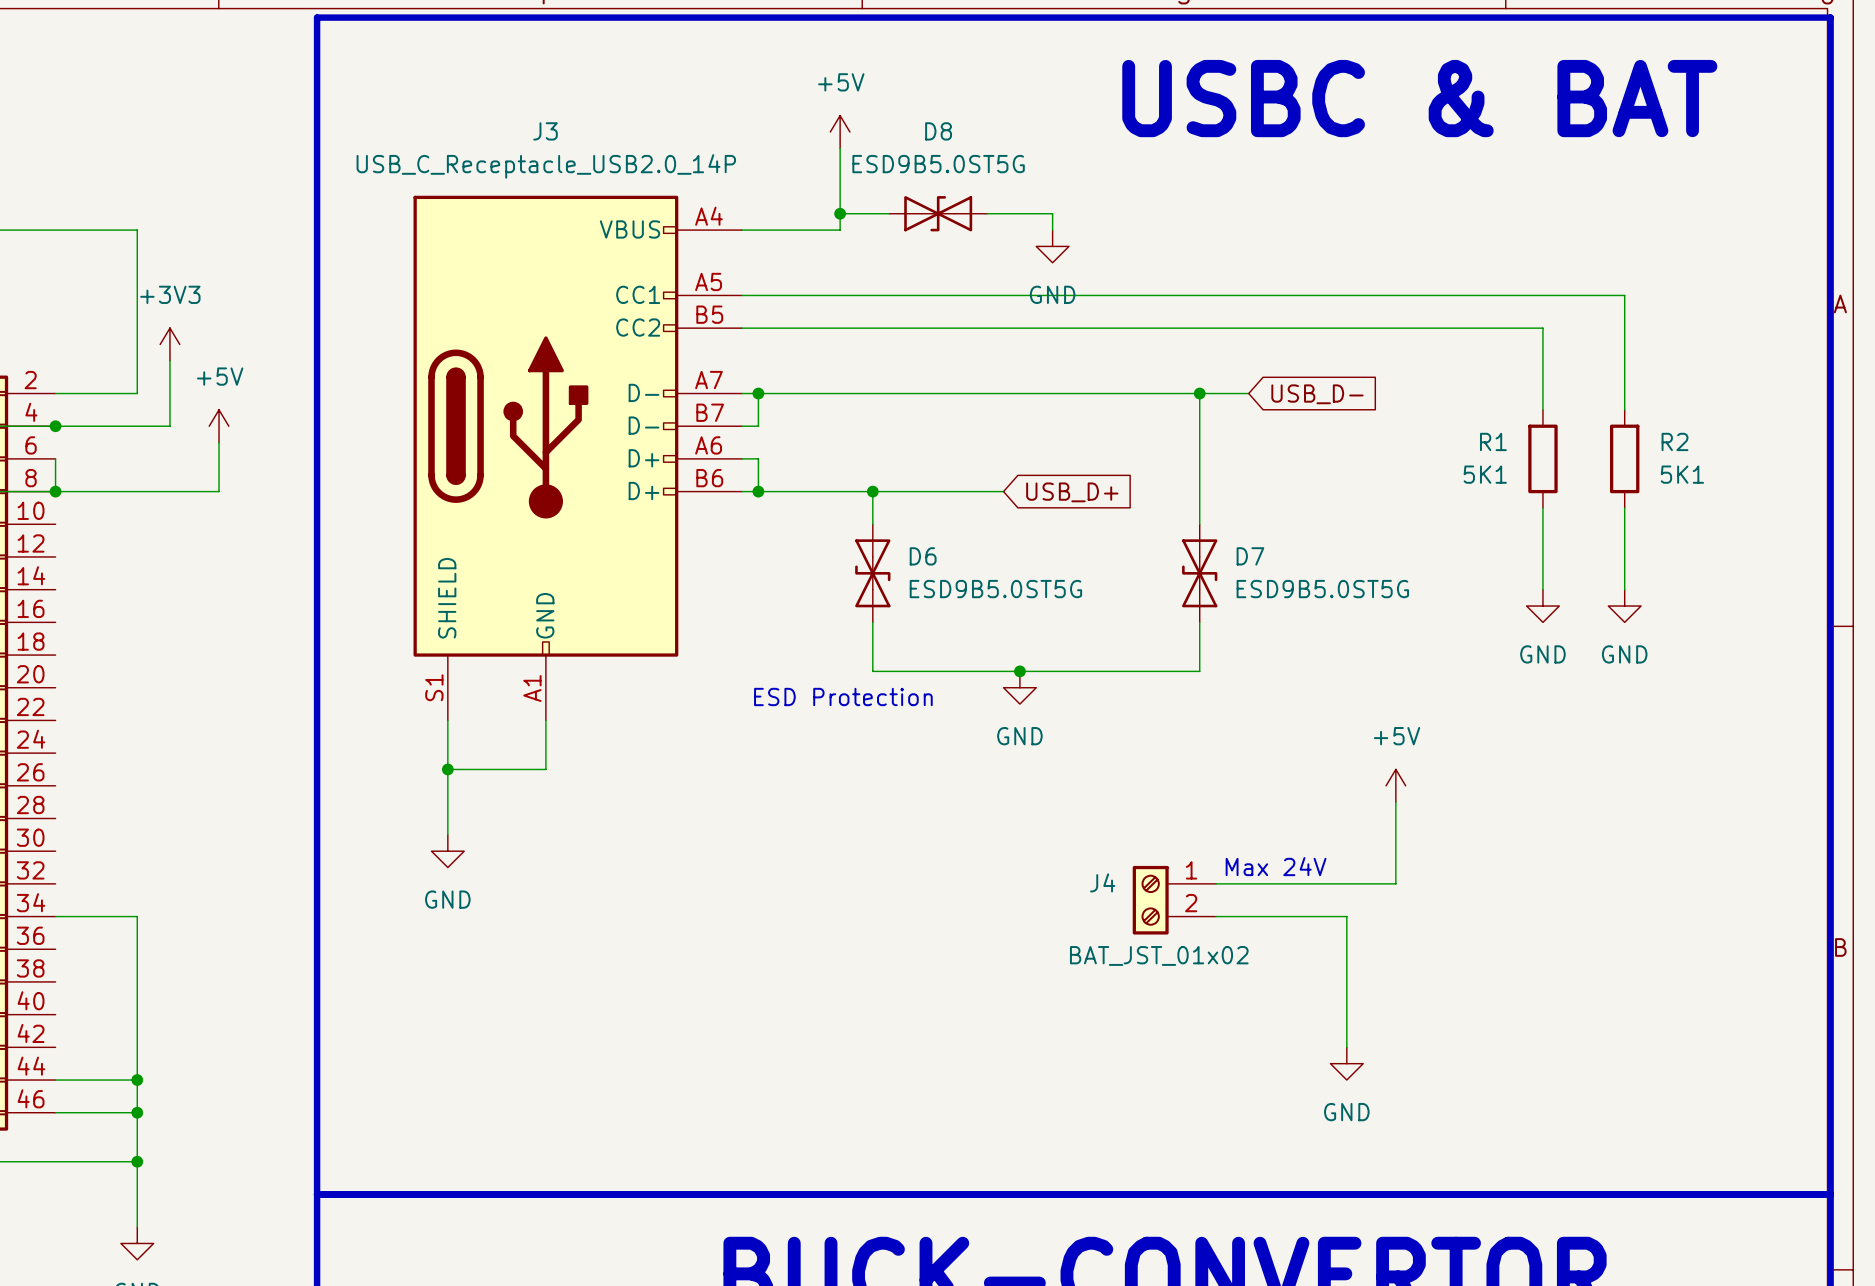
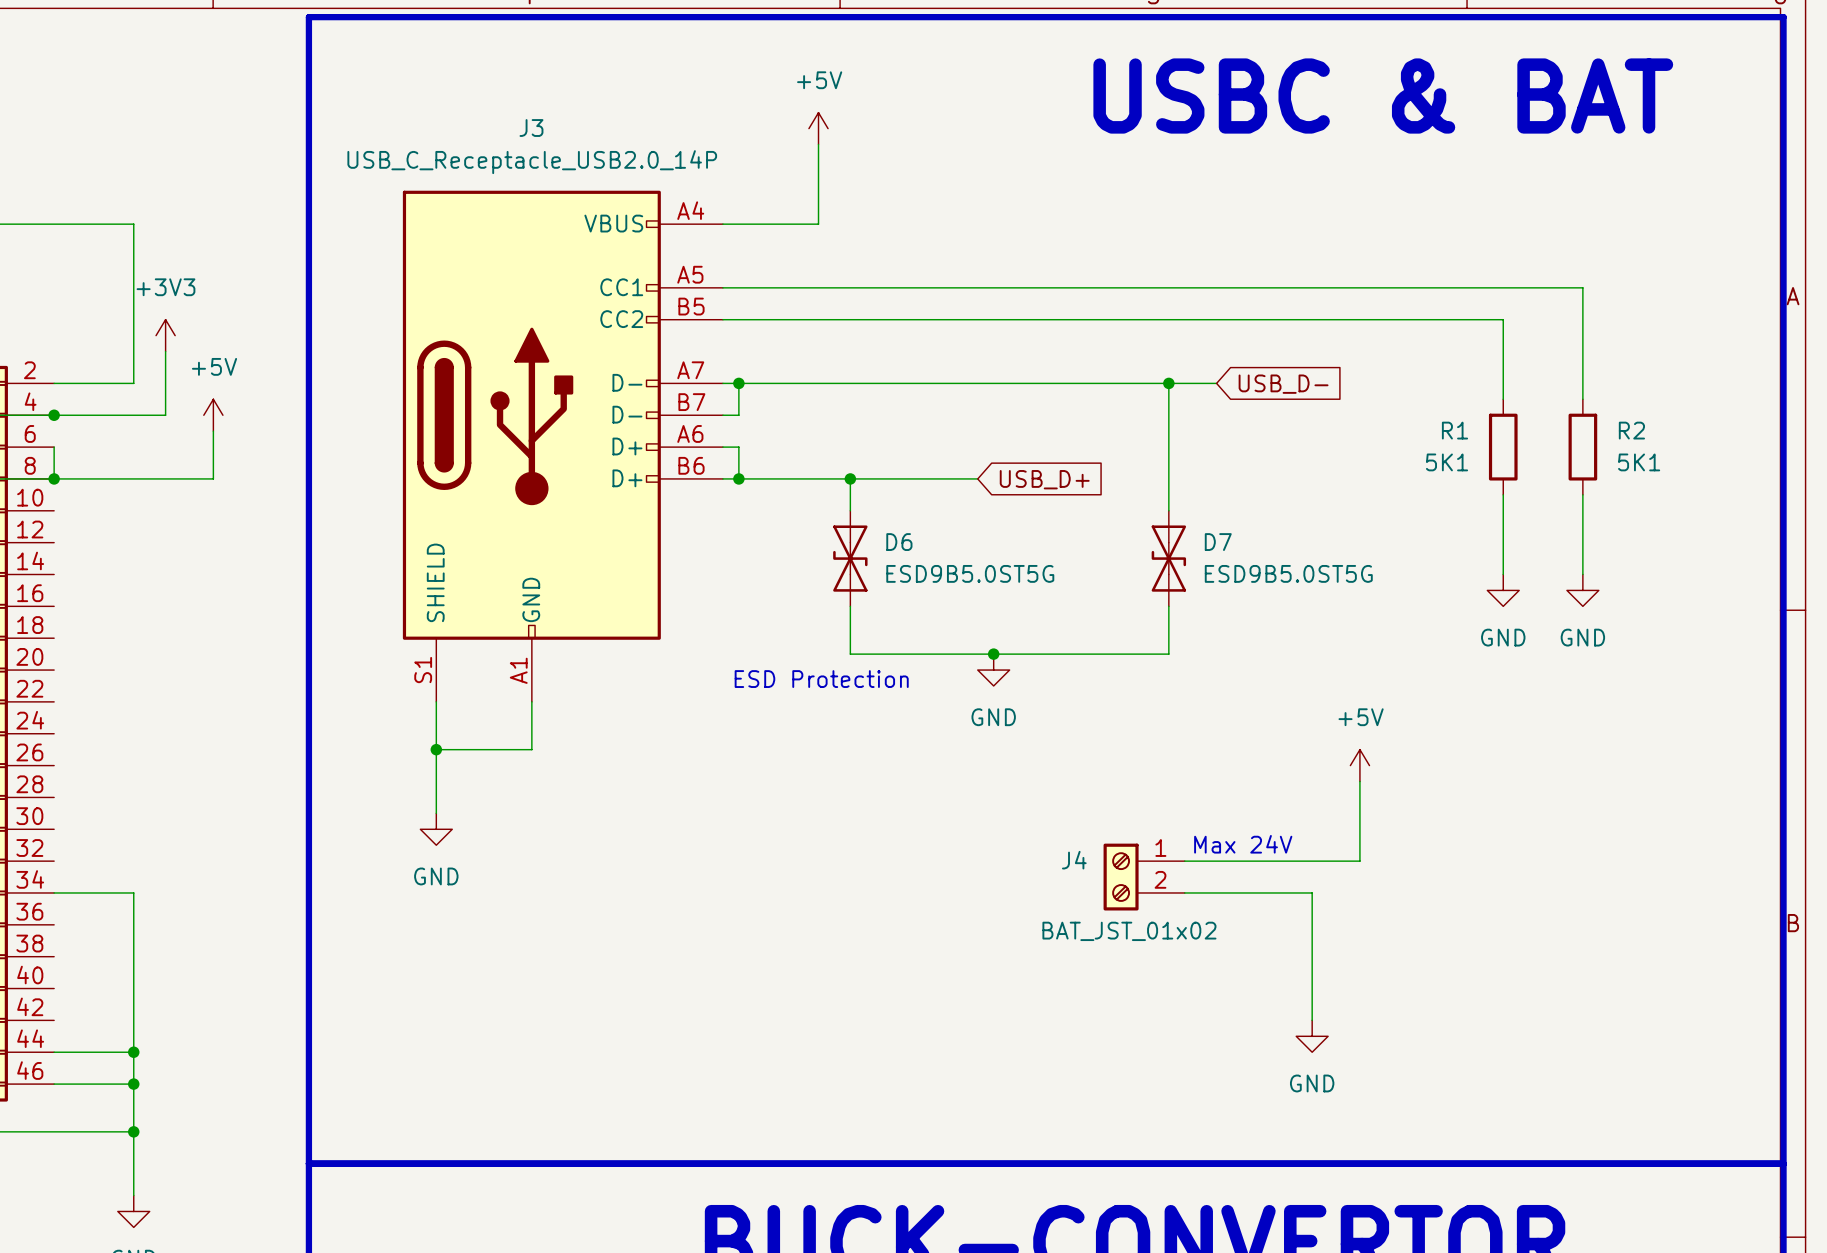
wire: (840, 213) (889, 213) -> none
junction: (840, 213) -> none
D8: ESD9B5.0ST5G (938, 213) -> none
wire: (987, 213) (1052, 213) (1052, 230) -> none
power symbol: GND (1052, 246) -> none

